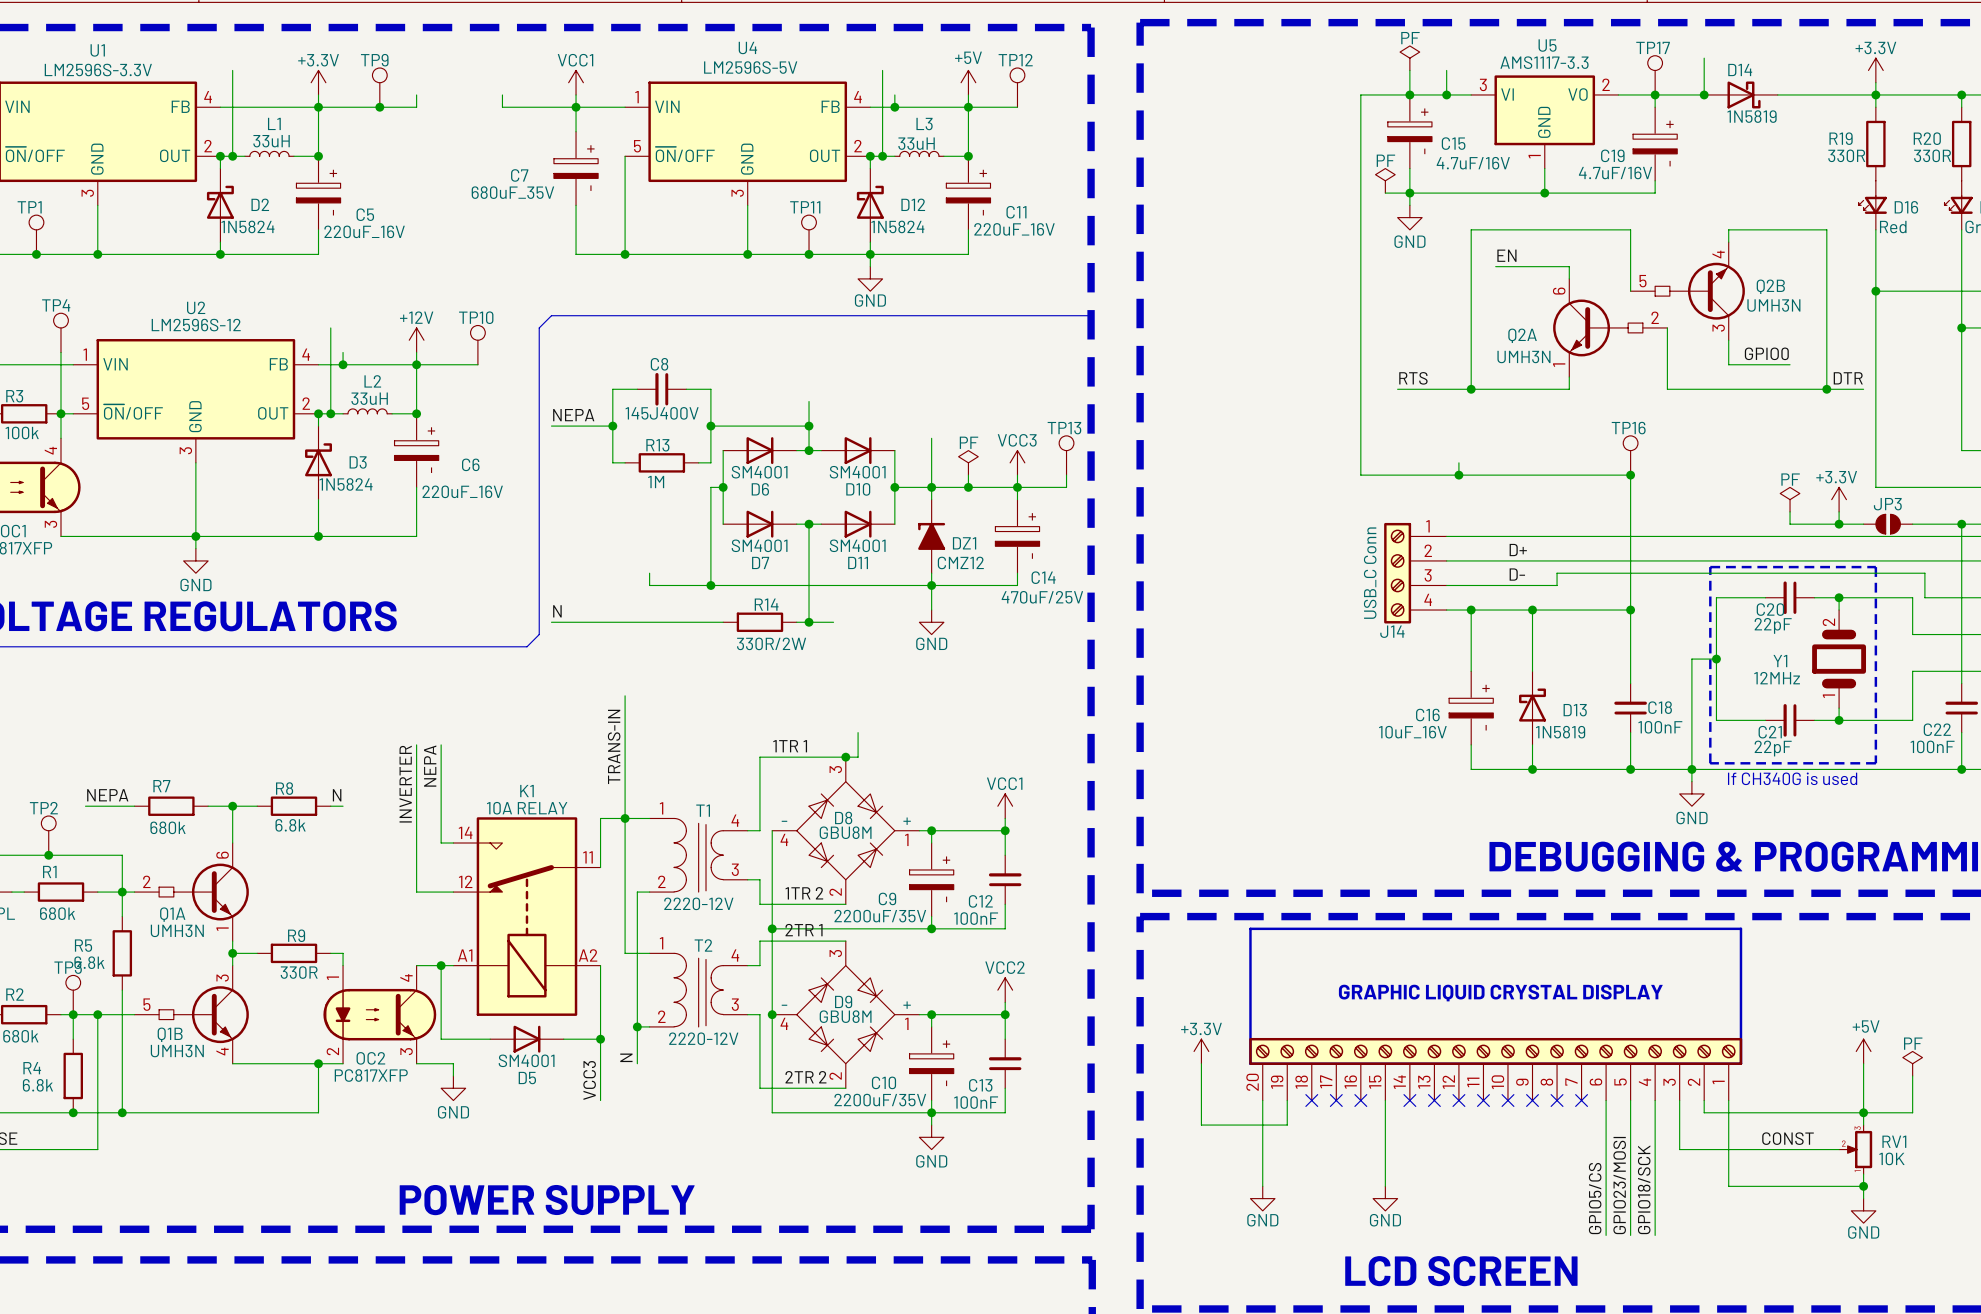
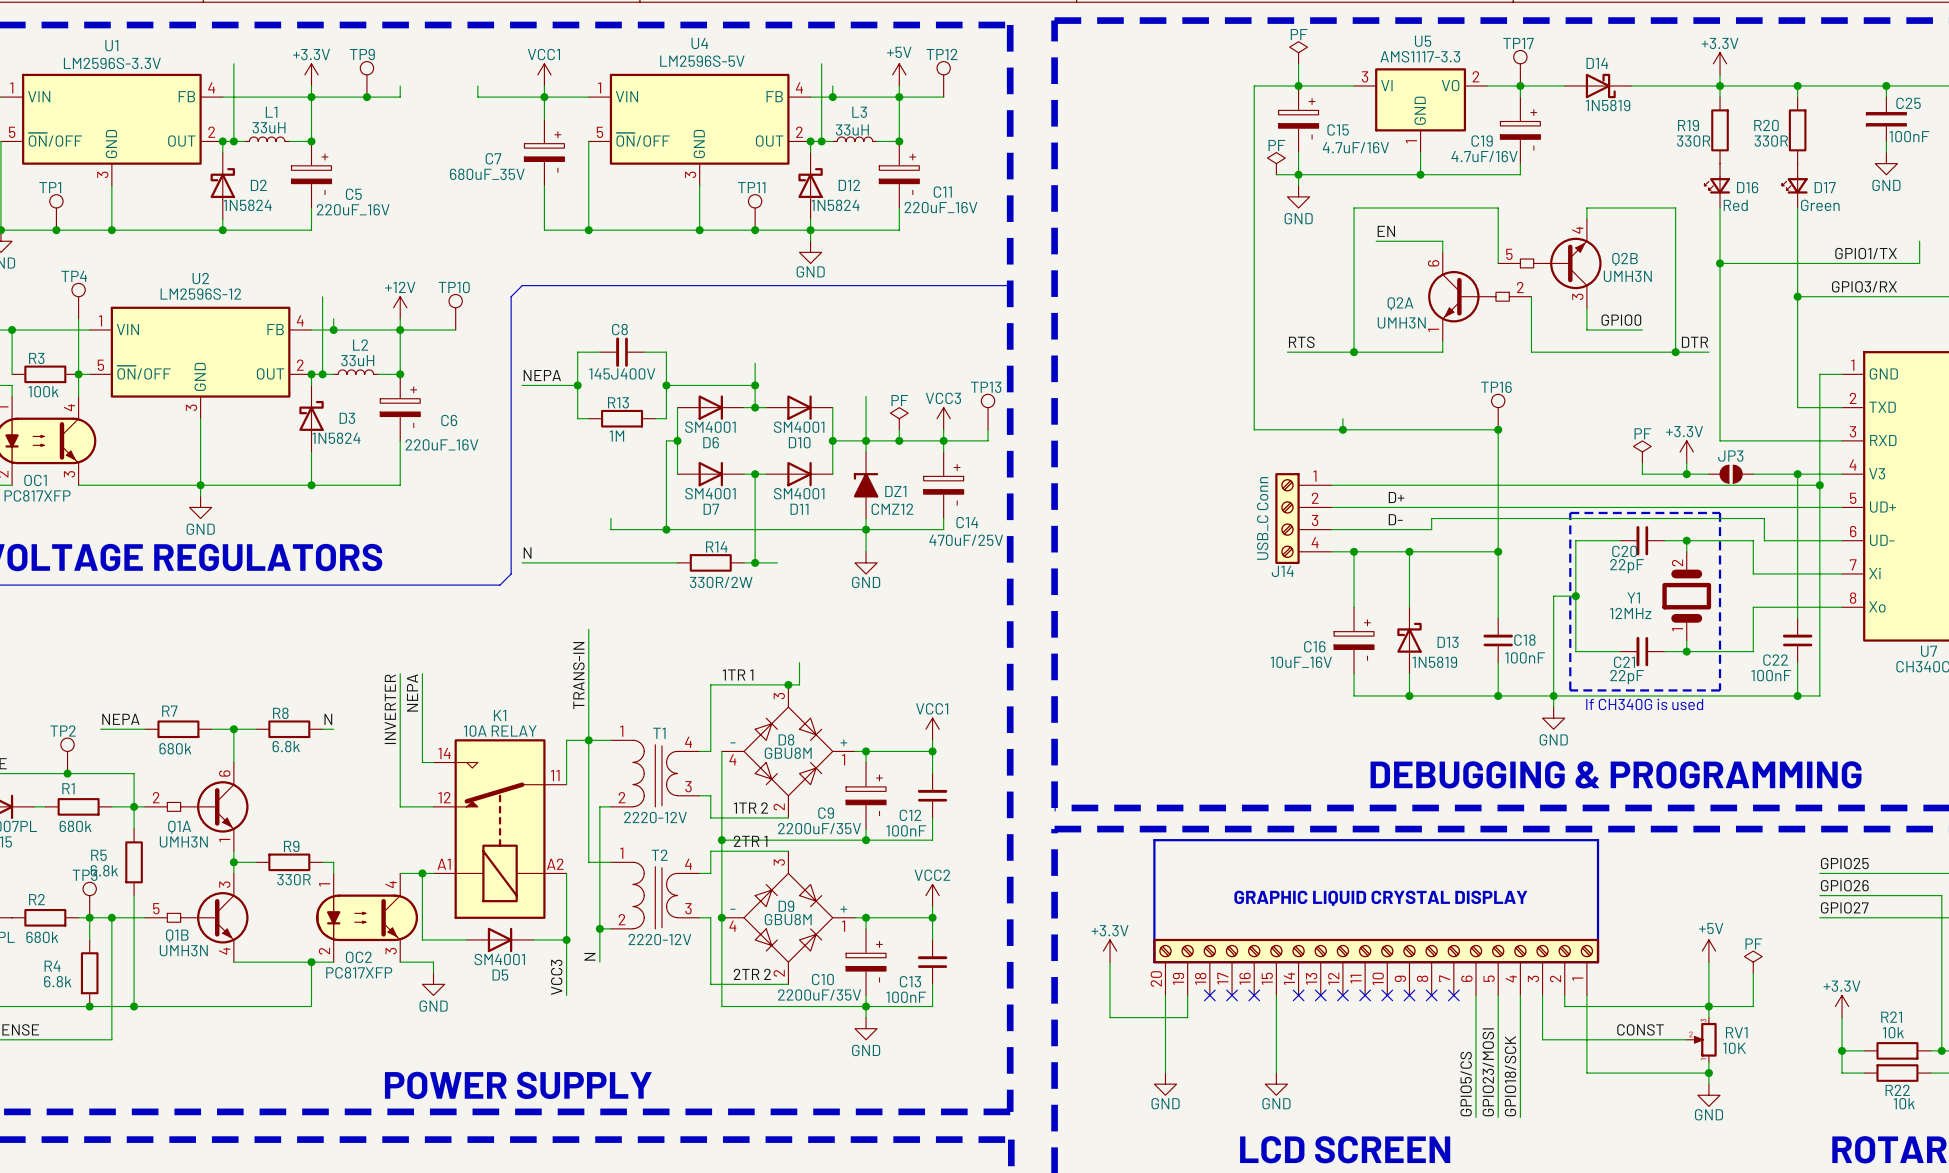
wire: (1704, 58) (1704, 94) -> none
wire: (1446, 70) (1446, 94) -> none
junction: (1446, 94) -> none
junction: (1704, 94) -> none

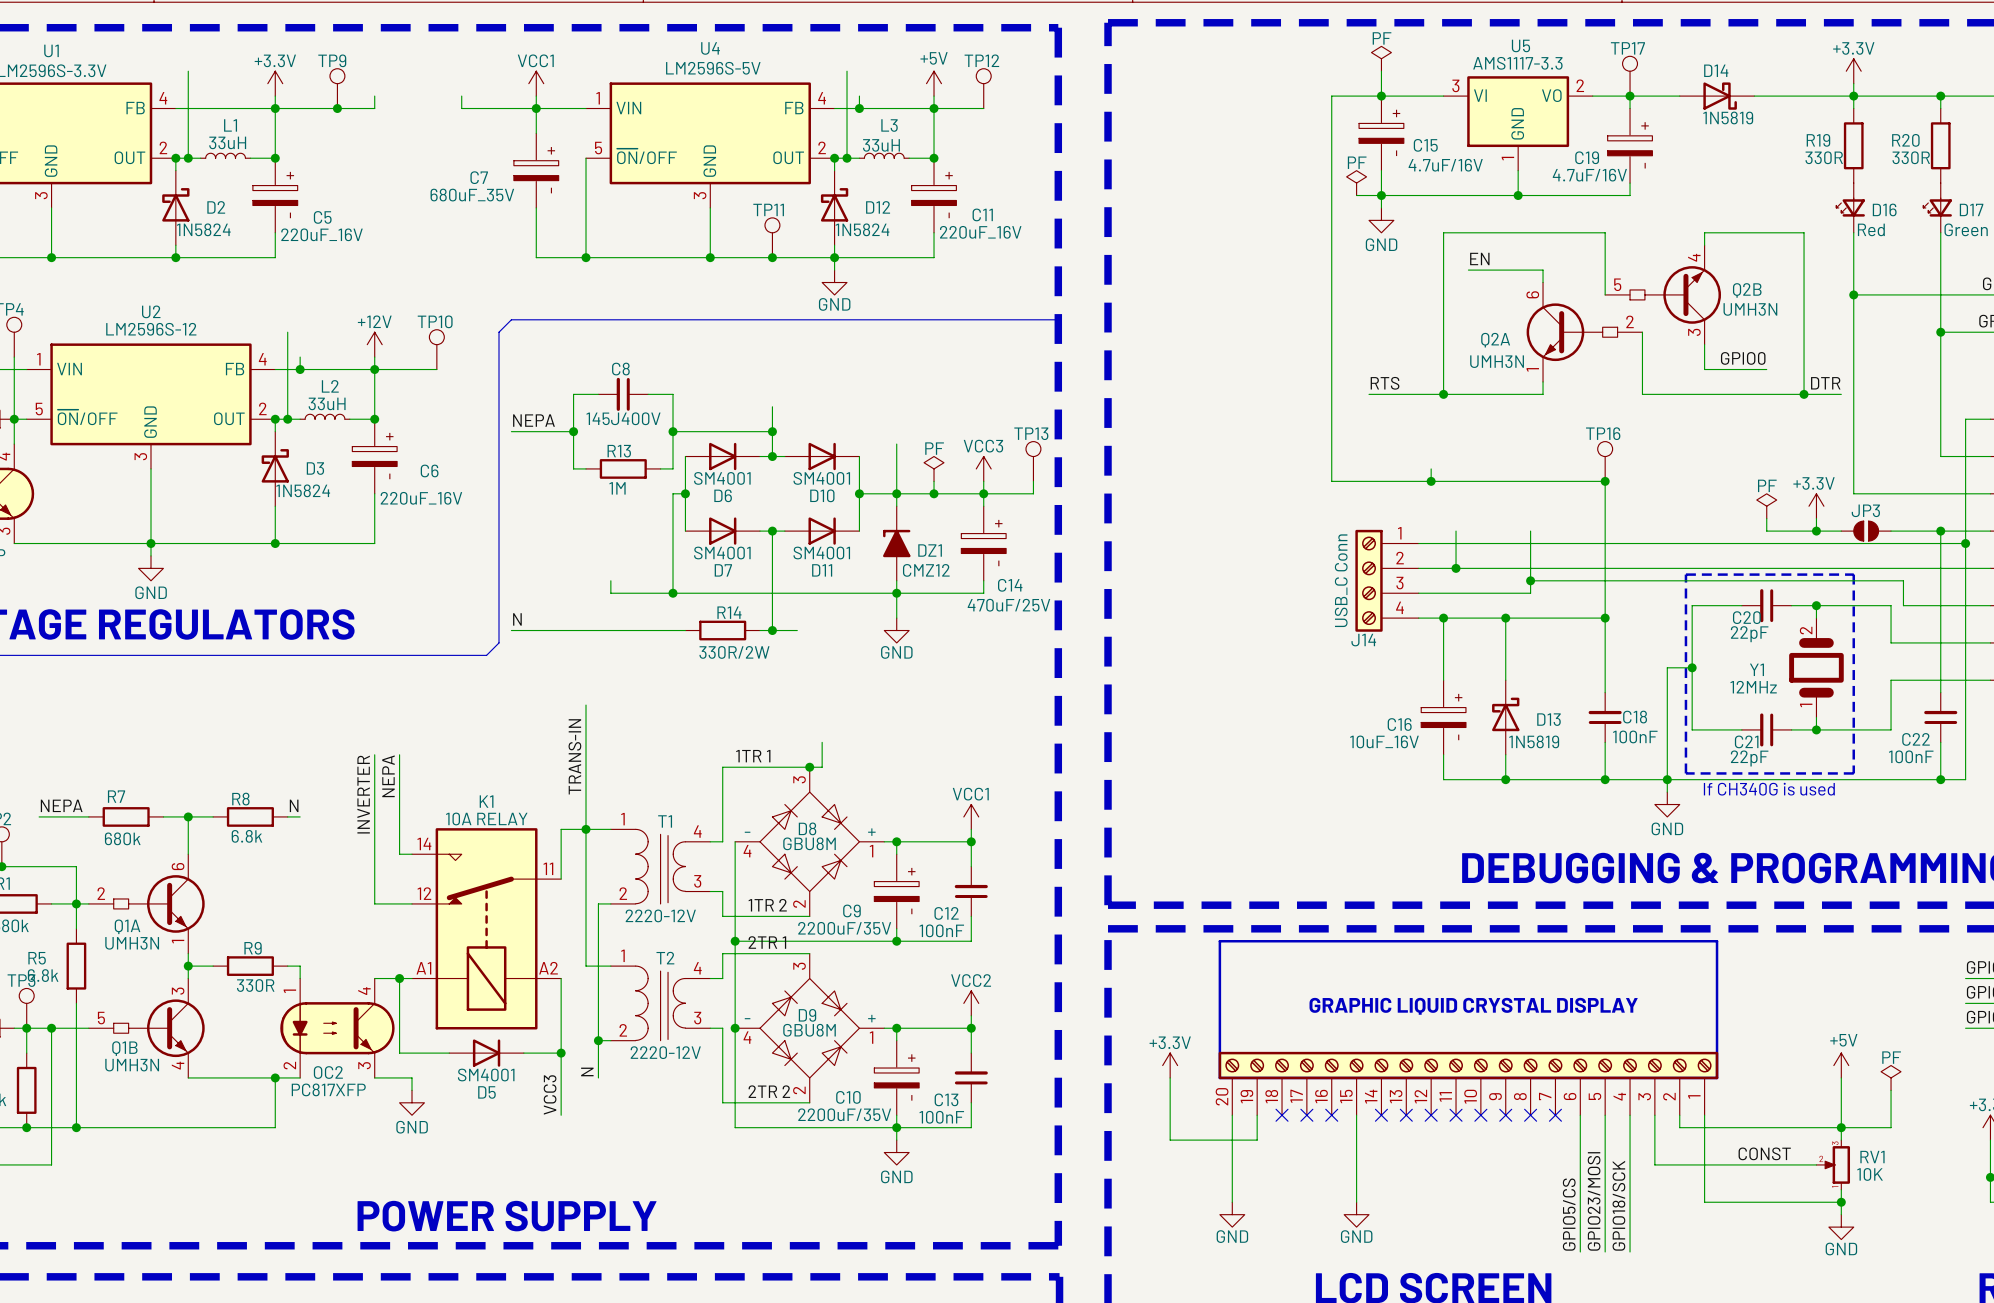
wire: none -> (1456, 531) (1456, 568)
wire: none -> (1530, 531) (1530, 580)
label: D+ (1396, 497) -> none
junction: none -> (1456, 568)
junction: none -> (1530, 580)
label: D- (1395, 519) -> none

